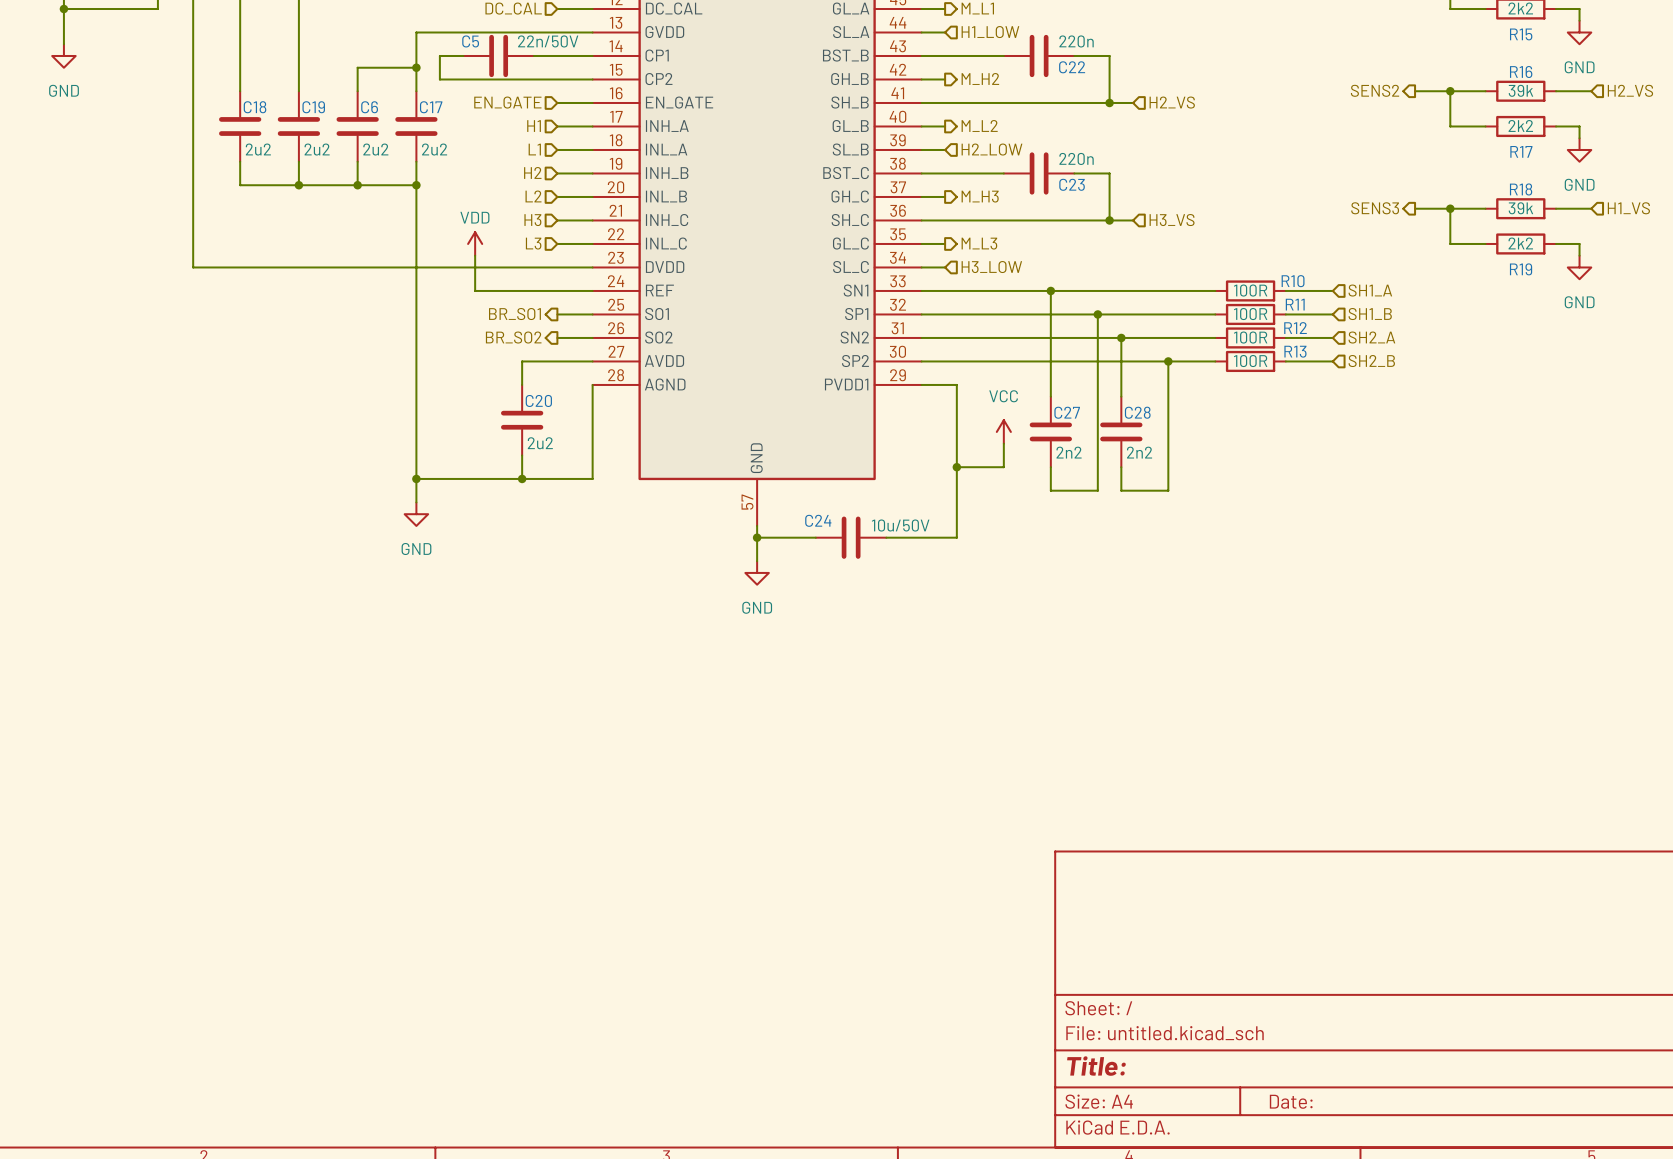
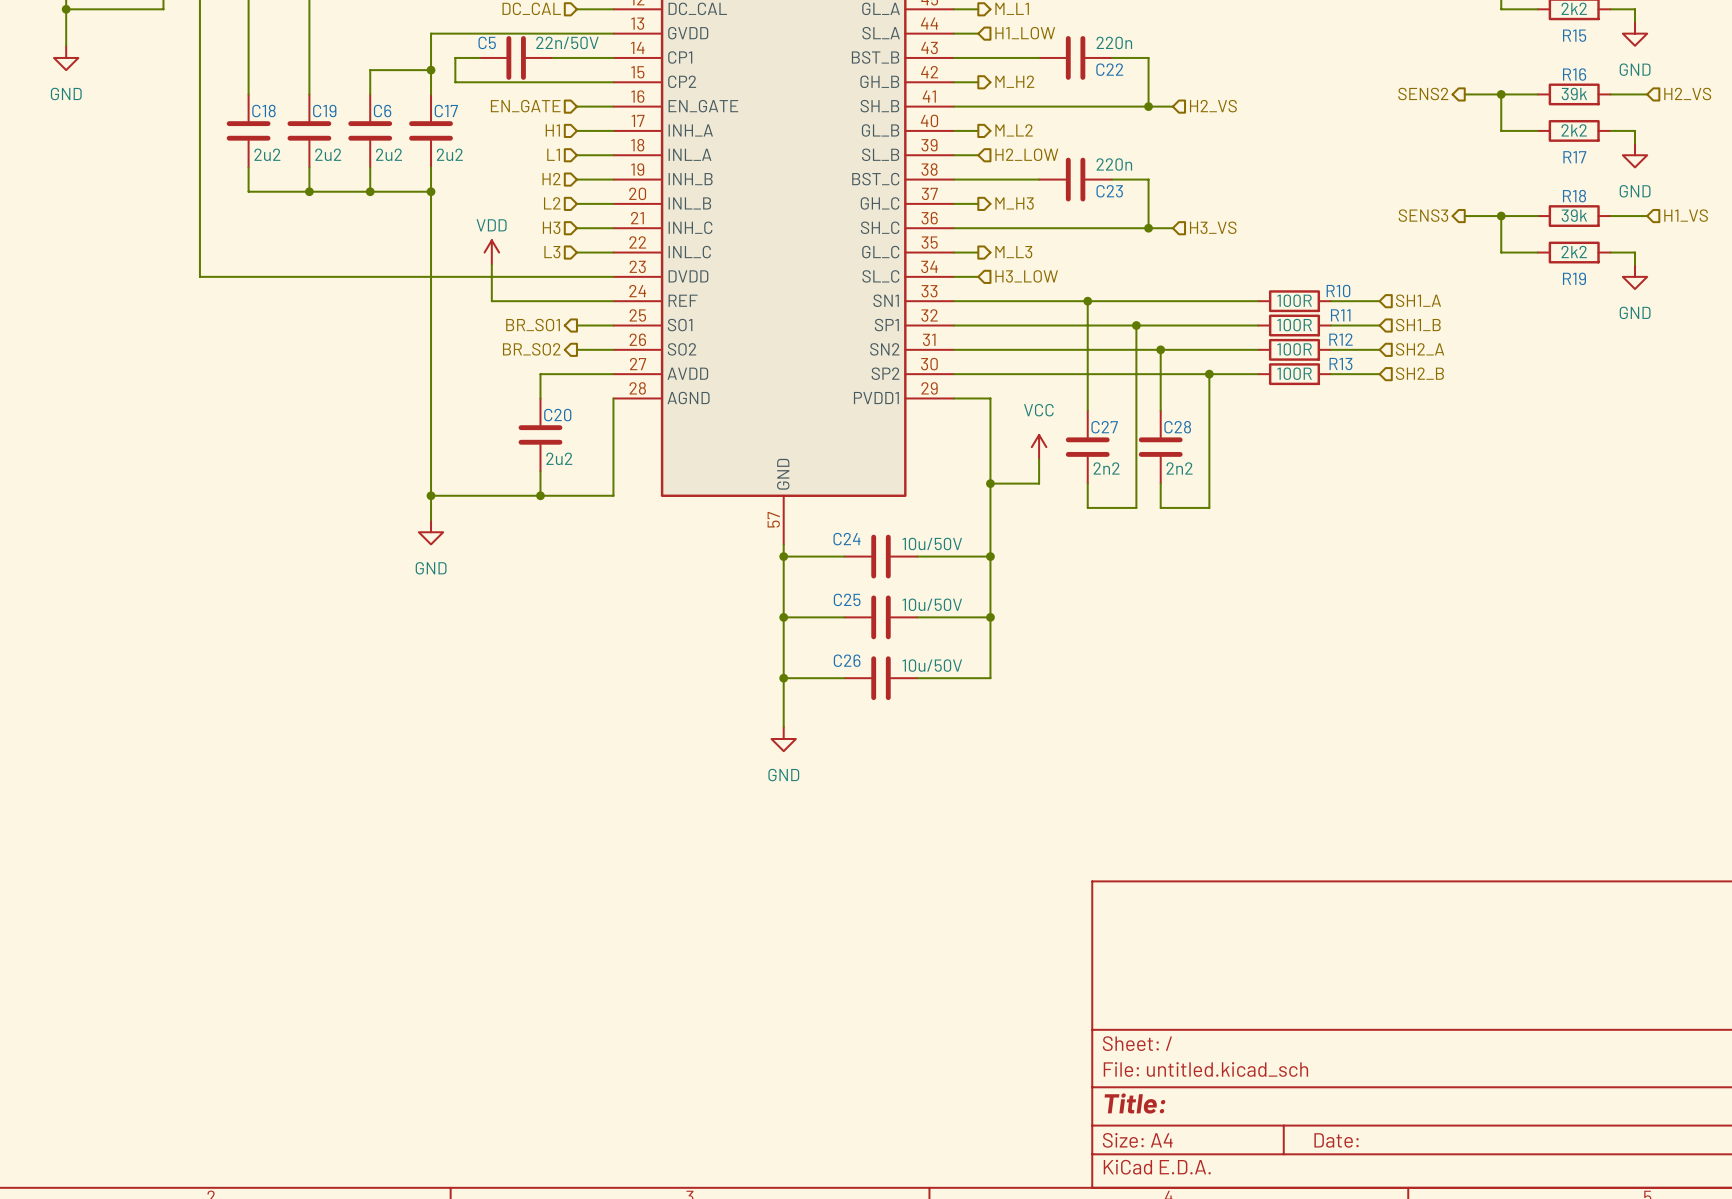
wire: none -> (990, 556) (990, 678) (917, 678)
junction: none -> (990, 556)
wire: none -> (783, 580) (783, 726)
power symbol position: GND (757, 572) -> GND (783, 739)
wire: none -> (783, 617) (844, 617)
junction: none -> (783, 617)
C25: none -> 10u/50V (880, 617)
wire: none -> (917, 617) (990, 617)
junction: none -> (990, 617)
wire: none -> (783, 678) (844, 678)
junction: none -> (783, 678)
C26: none -> 10u/50V (880, 678)

